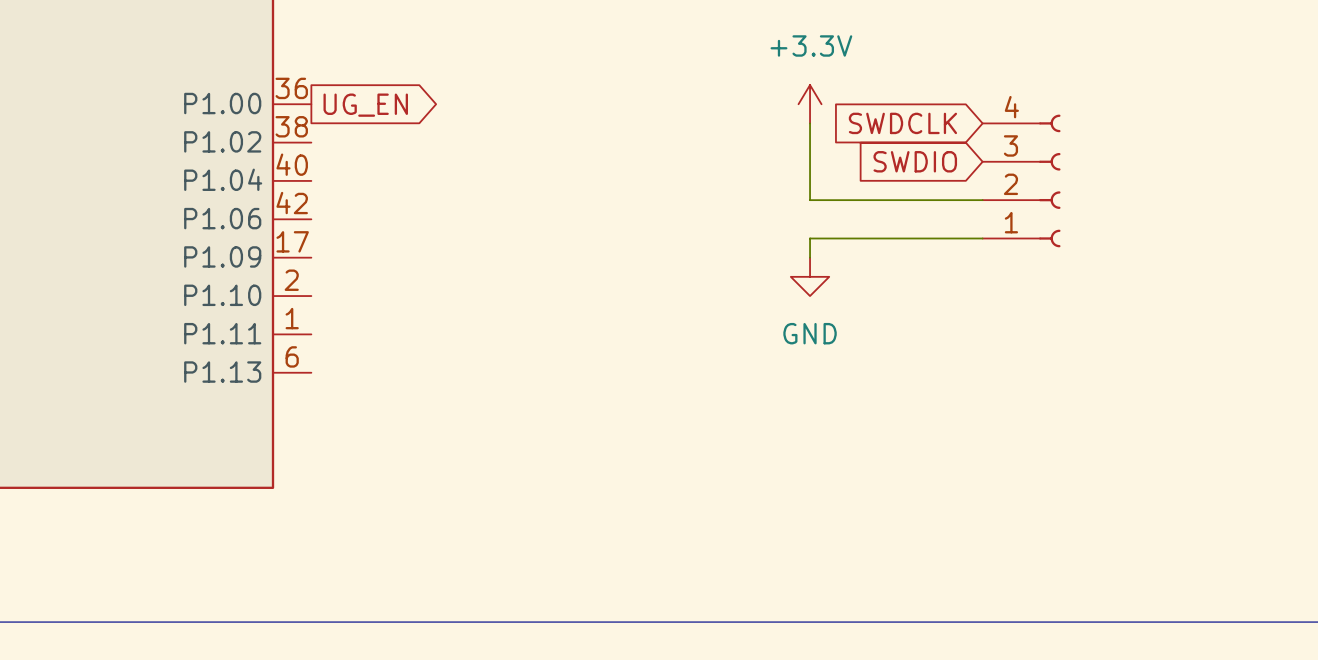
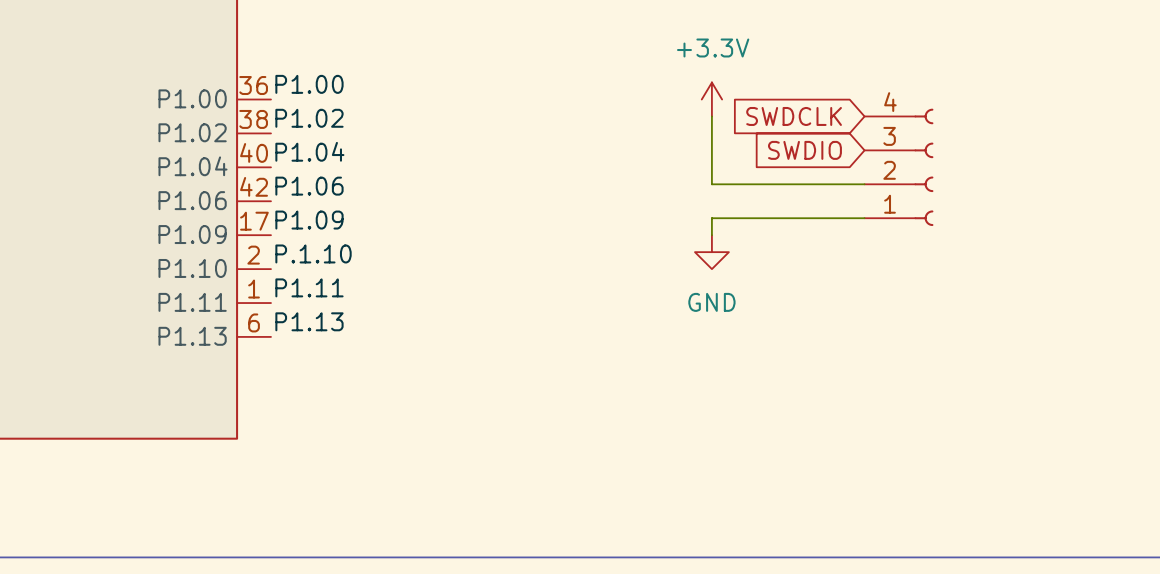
label: none -> P1.00 (309, 84)
global label: UG_EN (365, 105) -> none
label: none -> P1.02 (309, 118)
label: none -> P1.04 (309, 151)
label: none -> P1.06 (309, 186)
label: none -> P1.09 (309, 220)
label: none -> P.1.10 (313, 253)
label: none -> P1.11 (309, 287)
label: none -> P1.13 (309, 321)

